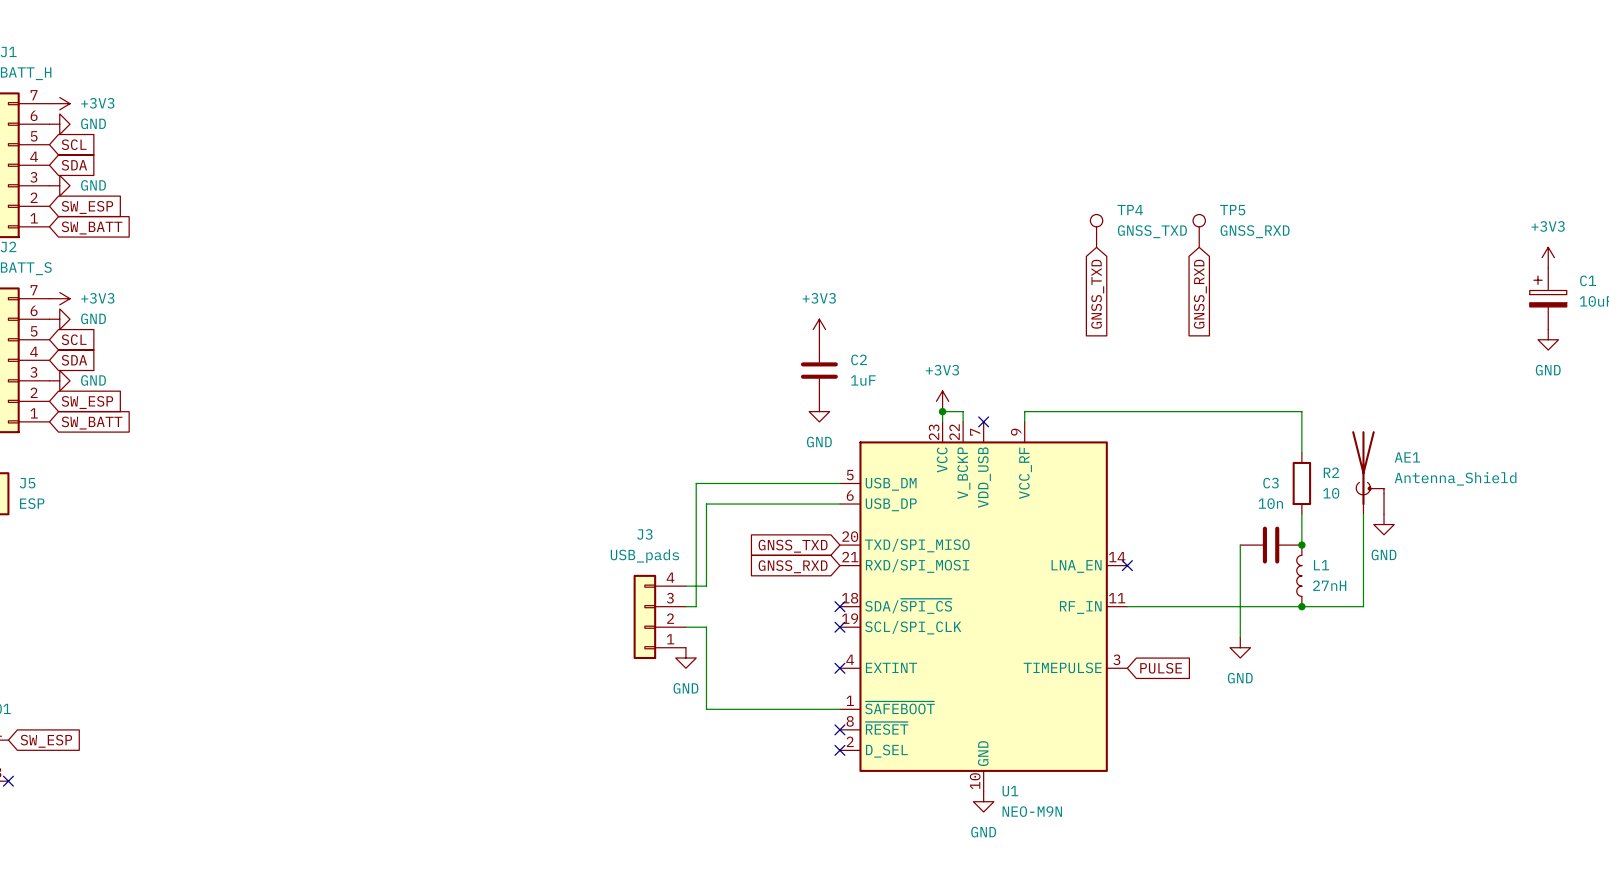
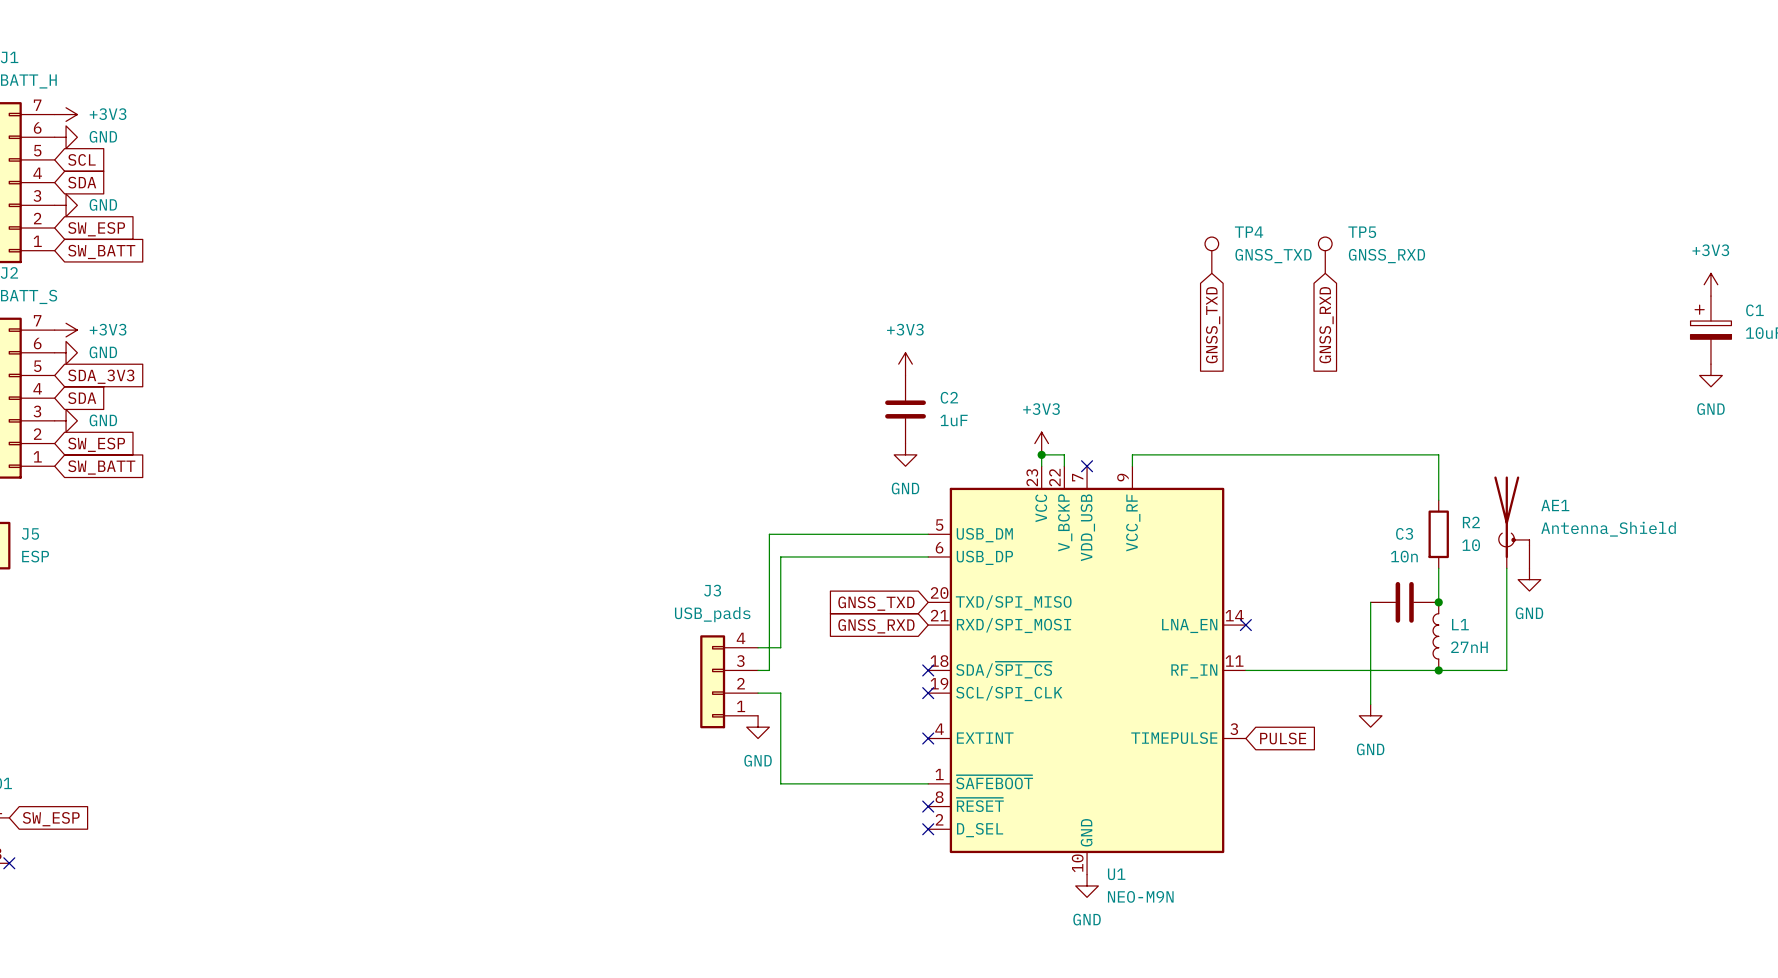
global label: SCL (74, 339) -> SDA_3V3 (101, 376)

